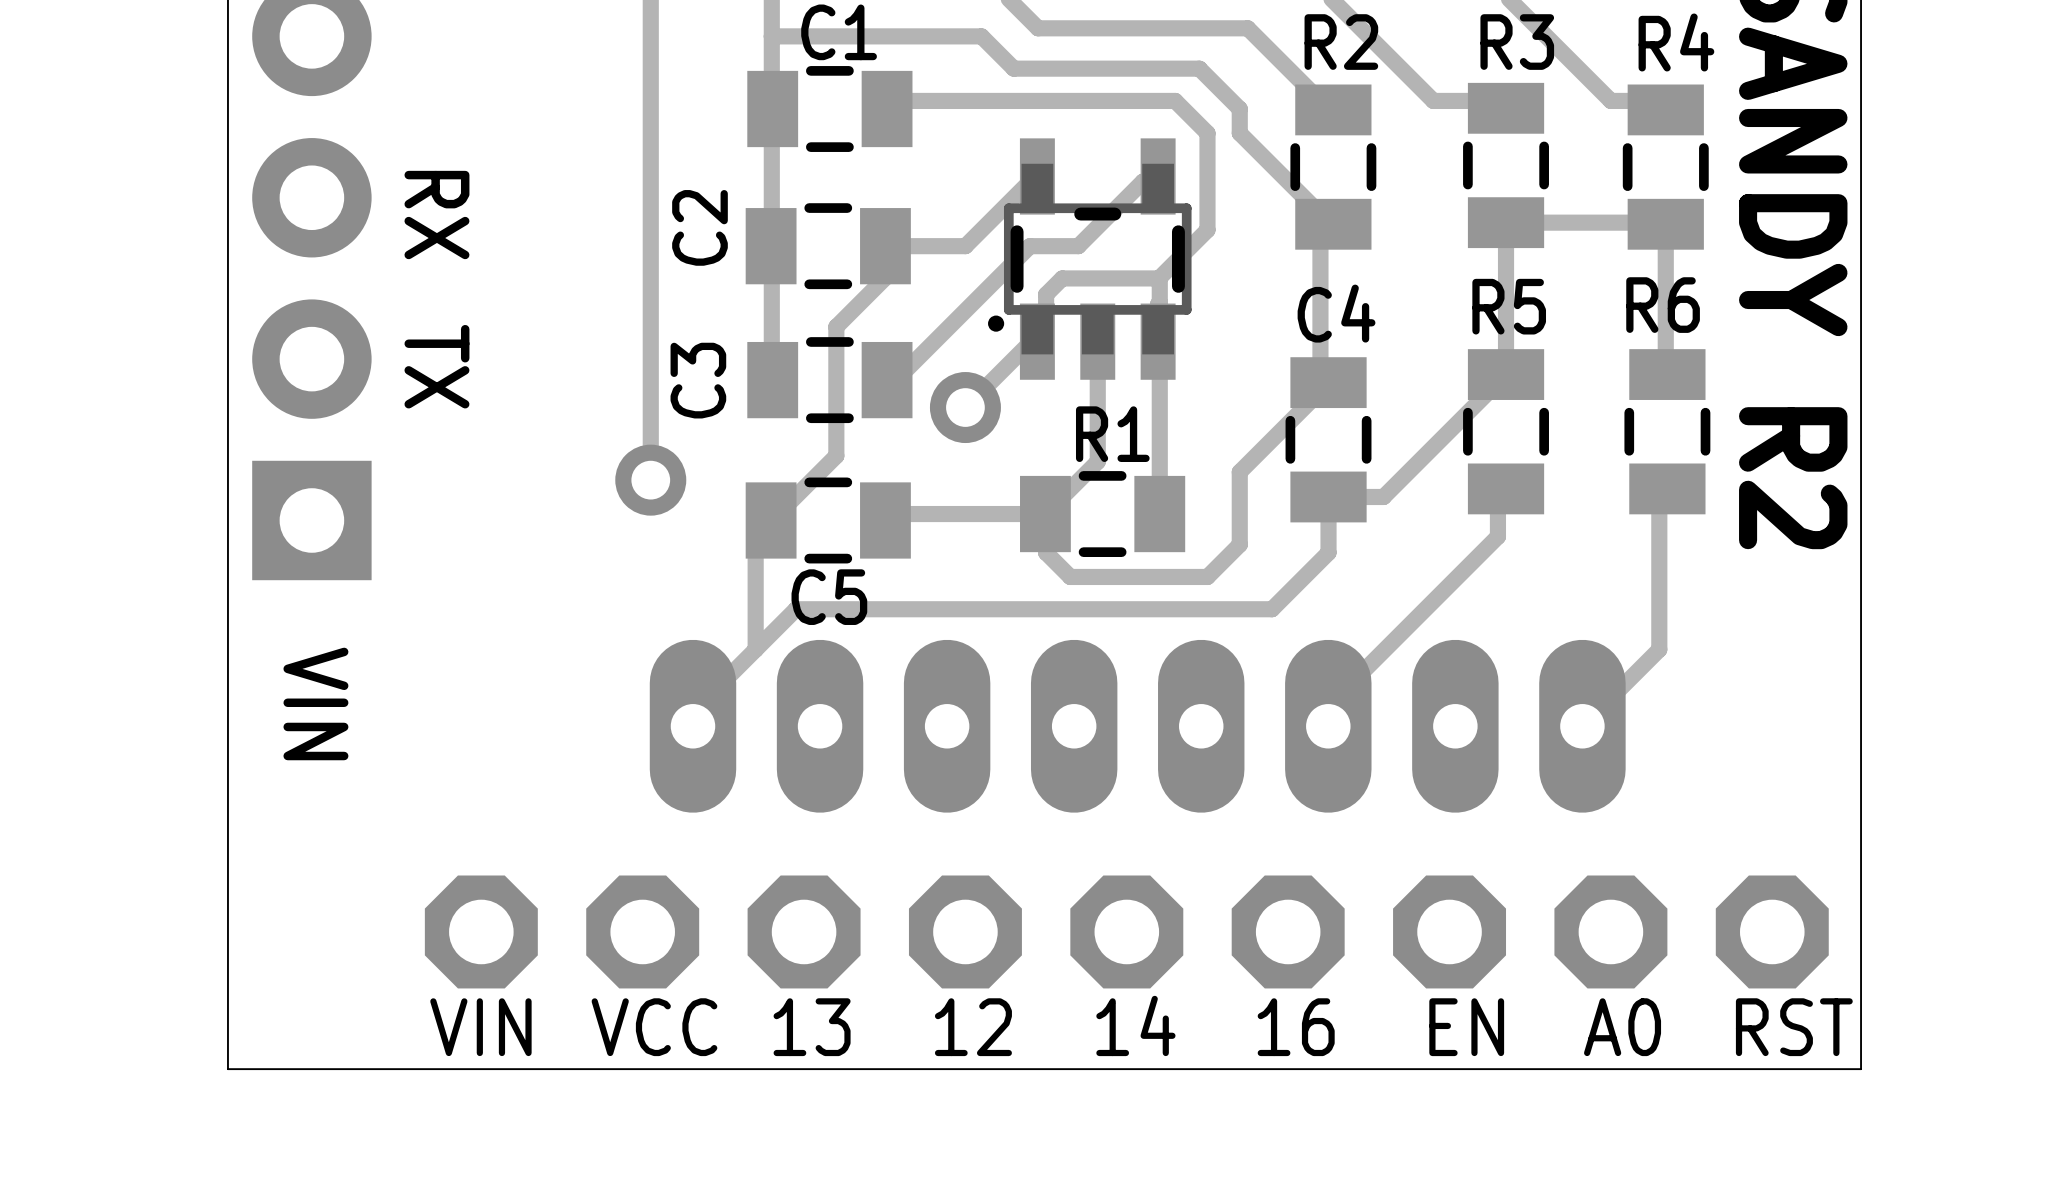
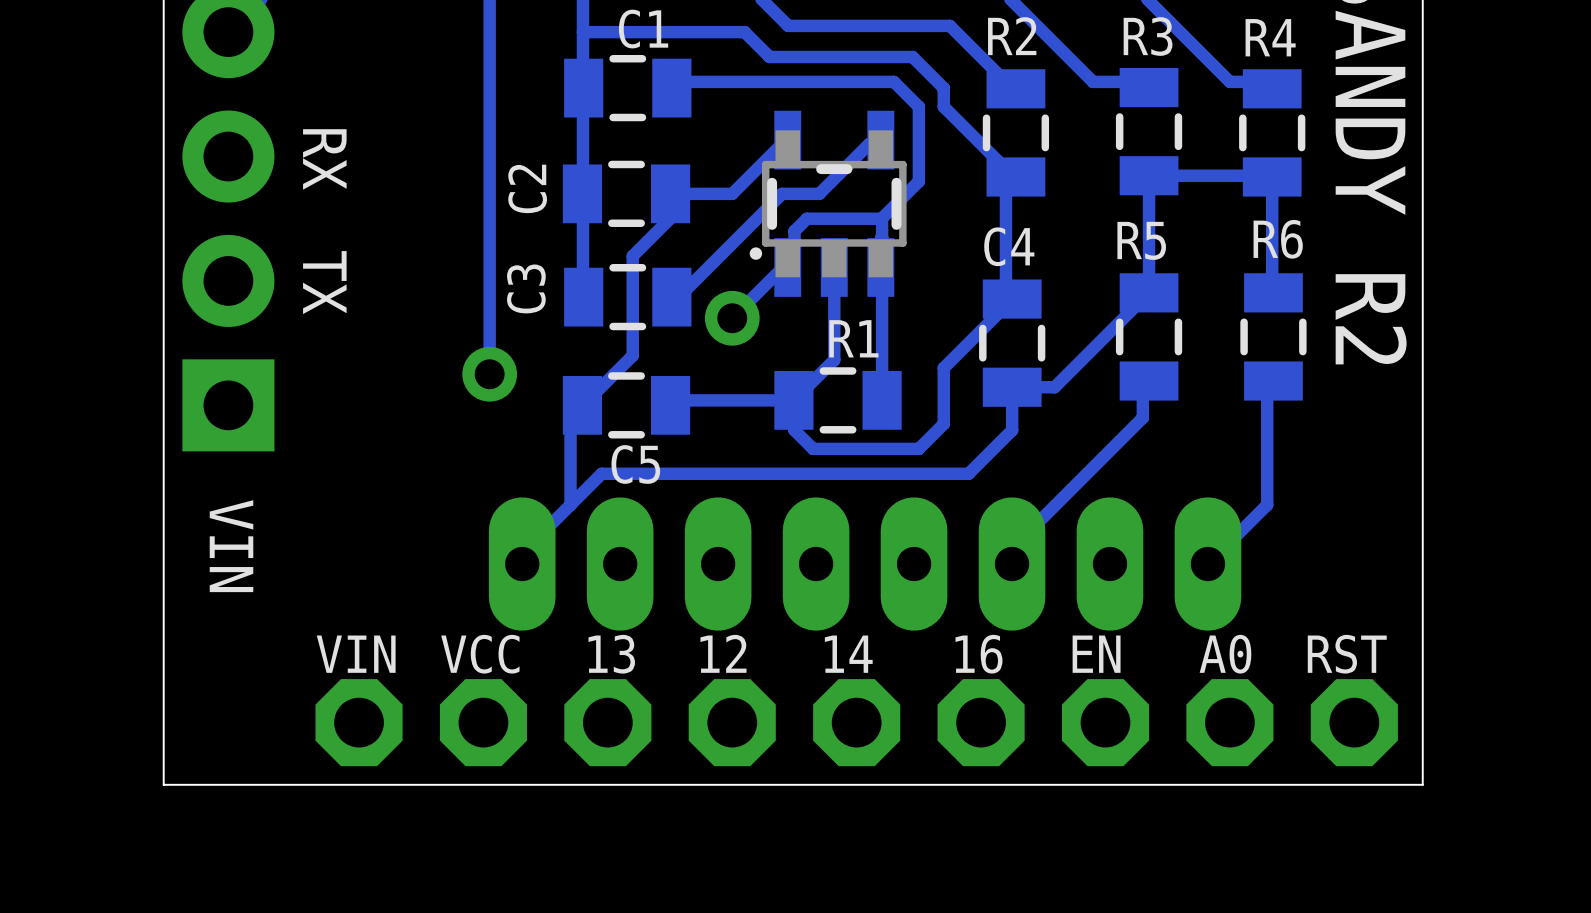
board edge: (1861, 1012) (1861, 1069) (227, 1069) (227, 1012) -> (1422, 784) (163, 784)
text position: 14 (1135, 1025) -> 14 (848, 654)
text position: VIN (480, 1027) -> VIN (356, 654)
text position: VCC (654, 1027) -> VCC (480, 654)
text position: 13 (812, 1027) -> 13 (611, 654)
text position: 12 (973, 1027) -> 12 (723, 653)
text position: 16 (1296, 1027) -> 16 (979, 654)
text position: EN (1466, 1027) -> EN (1096, 654)
text position: A0 (1622, 1027) -> A0 (1225, 654)
text position: RST (1794, 1027) -> RST (1347, 654)

